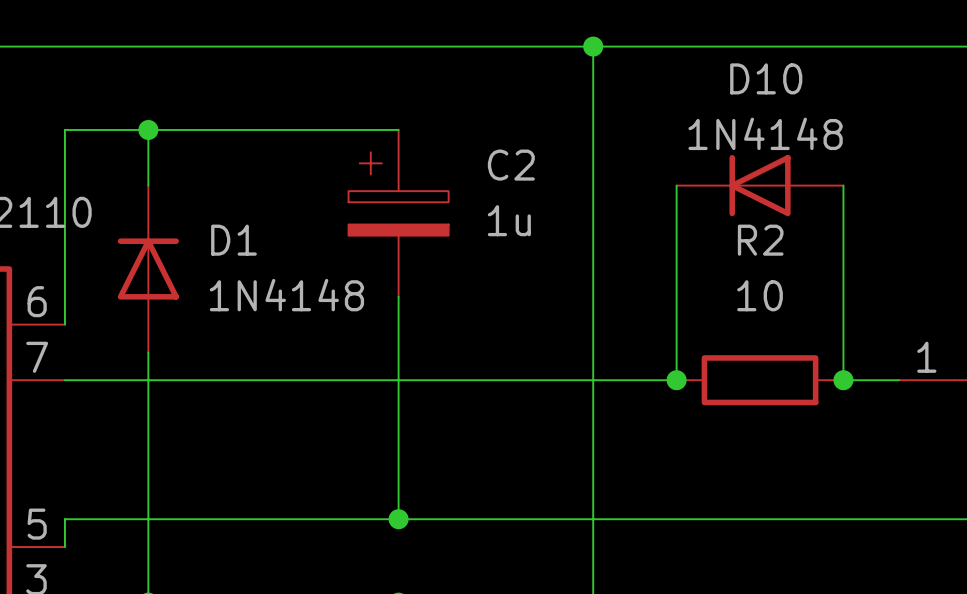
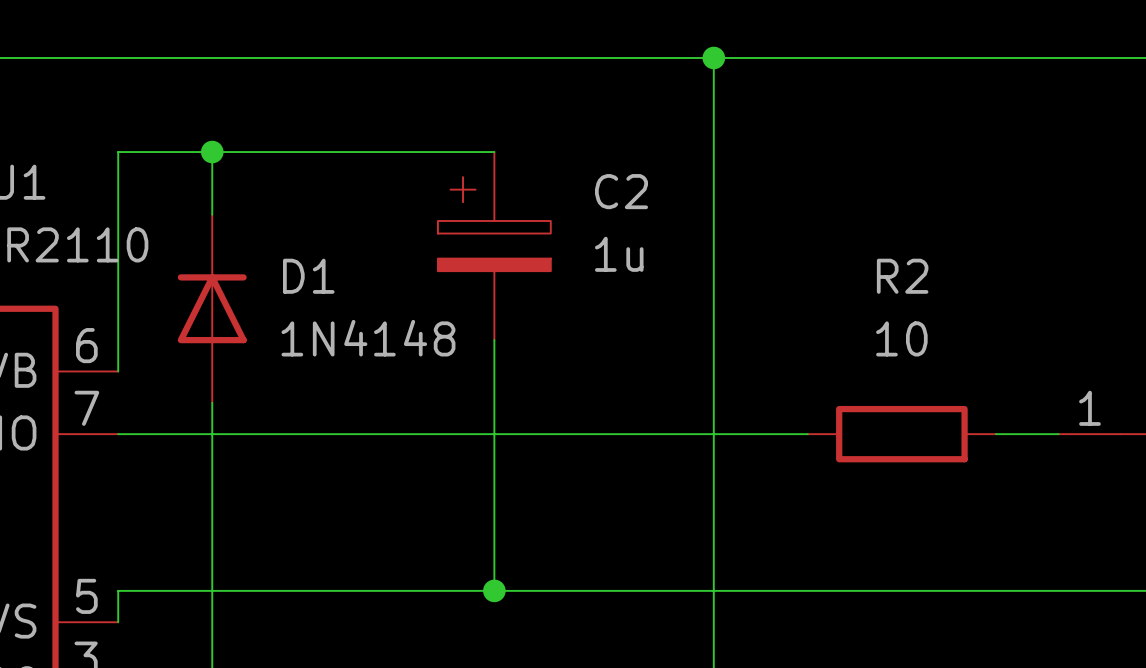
wire: (676, 185) (676, 380) -> none
D10: 1N4148 (760, 185) -> none
wire: (843, 185) (843, 380) -> none
junction: (676, 380) -> none
junction: (843, 380) -> none

